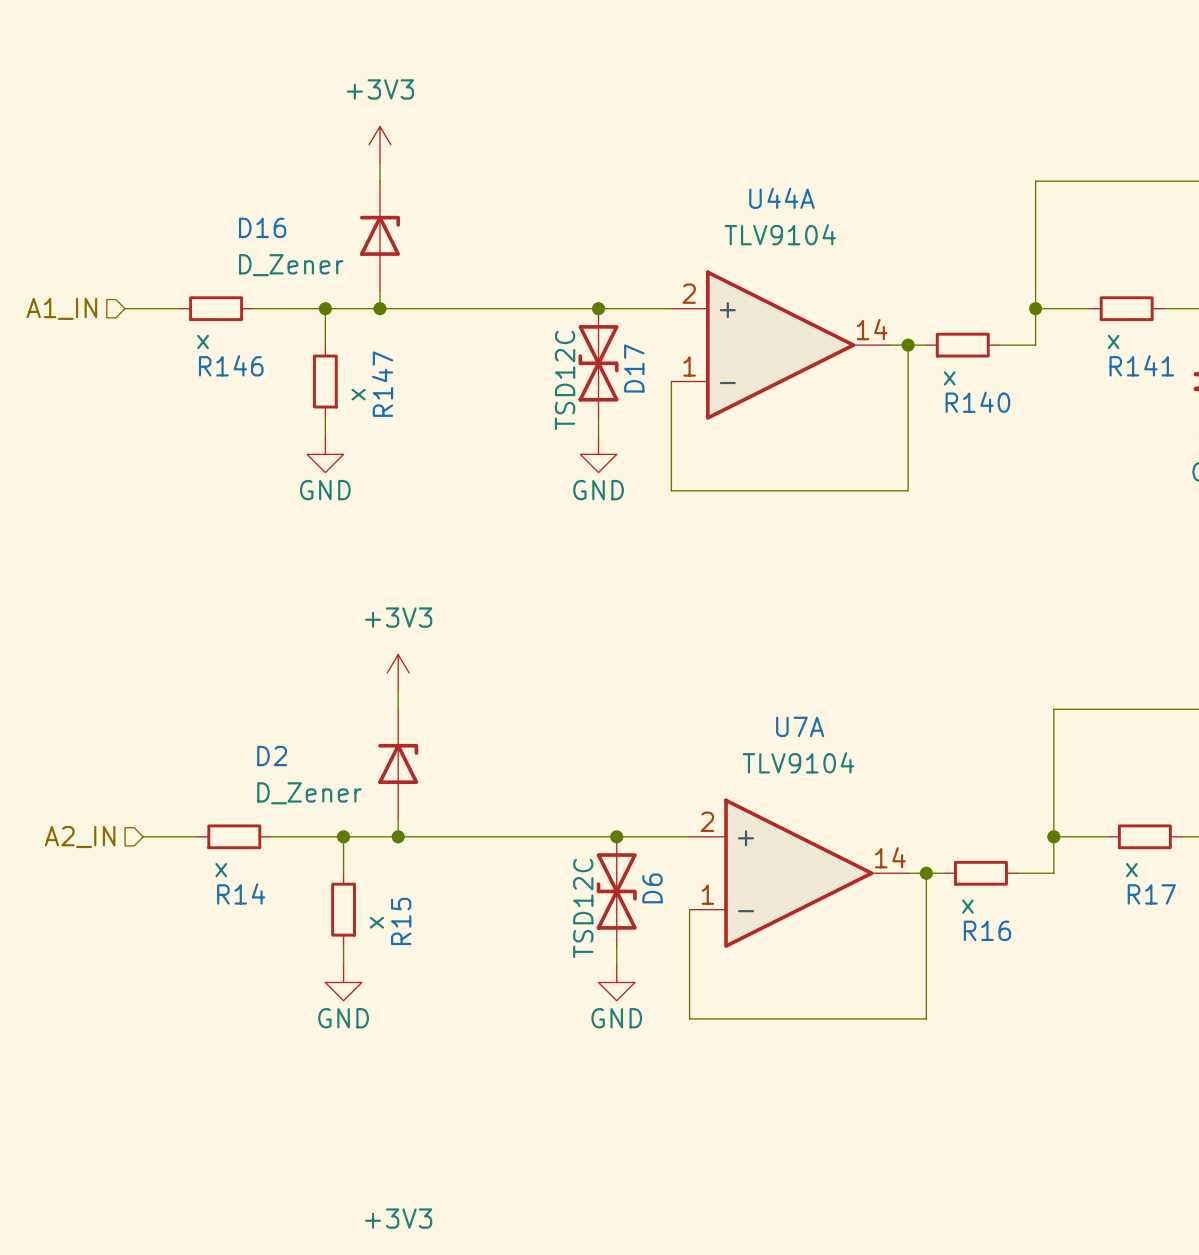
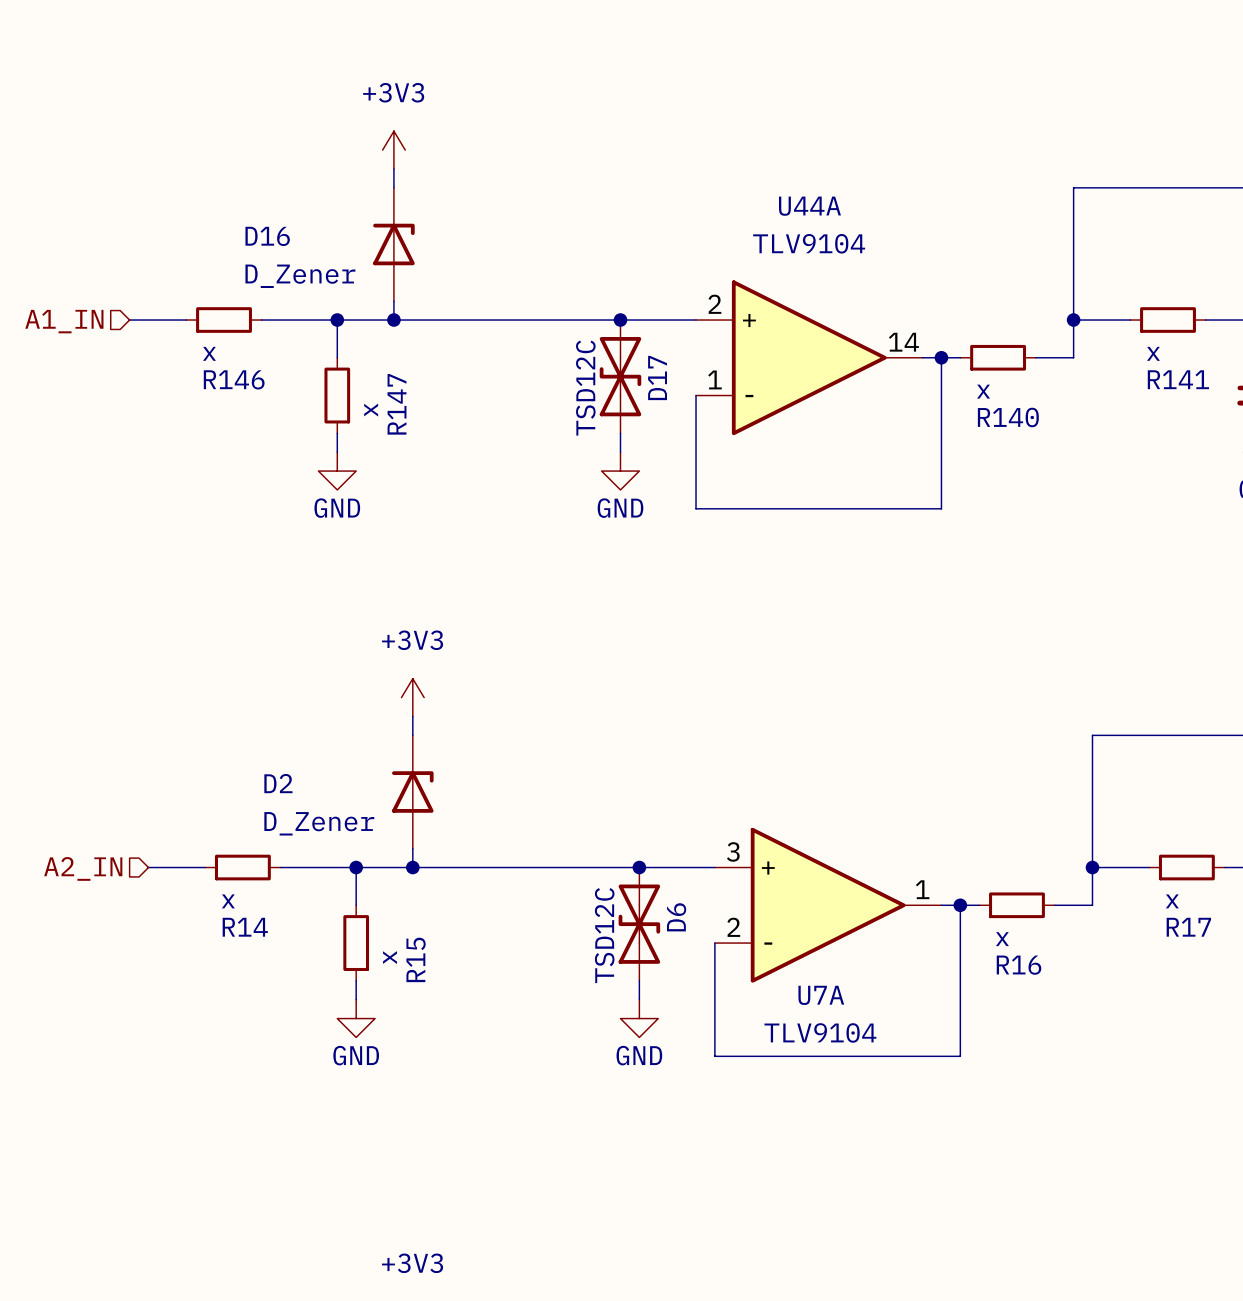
U7A name position: U7A (800, 726) -> U7A (821, 995)
U7A value position: TLV9104 (798, 762) -> TLV9104 (820, 1032)
U7A pin number: 2 (707, 821) -> 3 (733, 851)
U7A pin number: 14 (890, 857) -> 1 (922, 889)
U7A pin number: 1 (707, 894) -> 2 (733, 927)

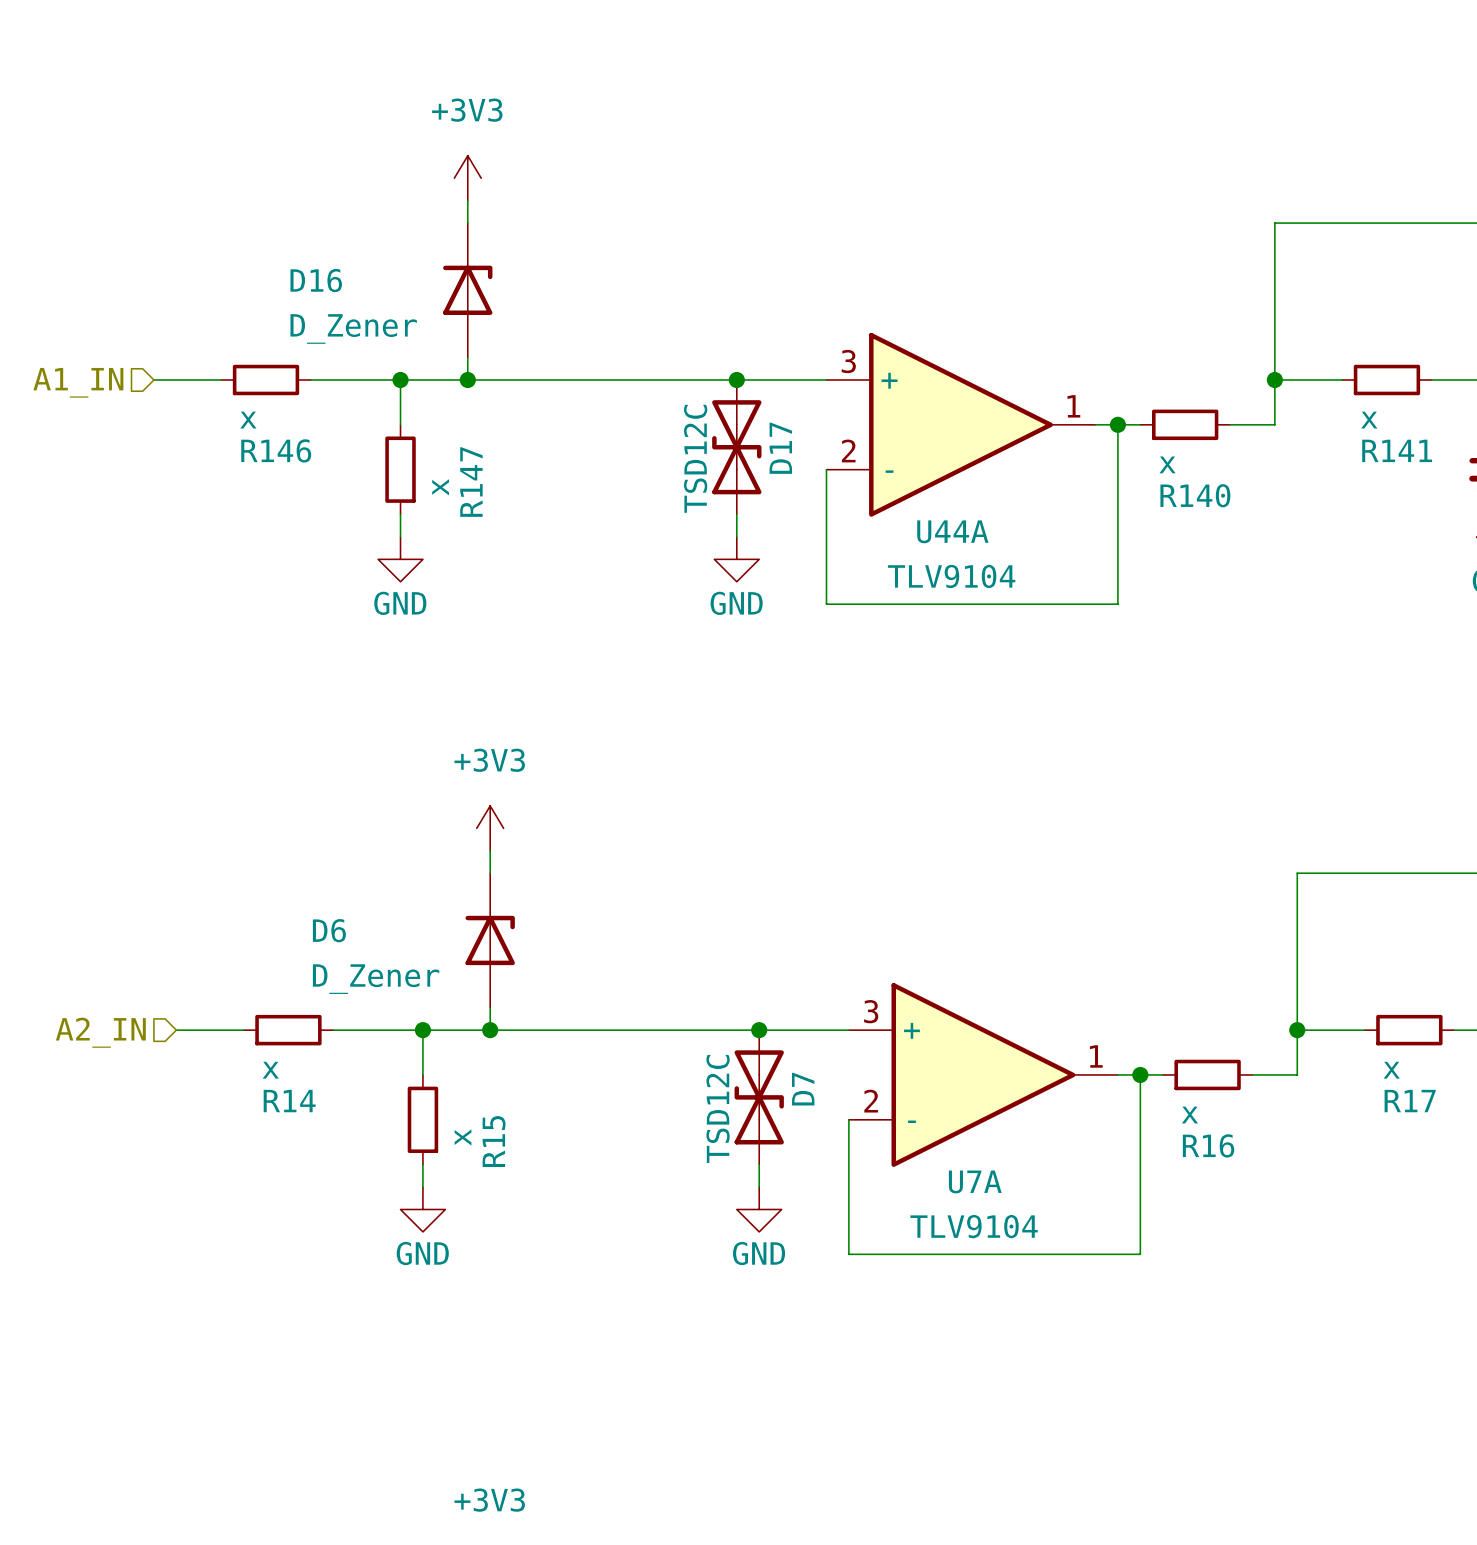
U44A name position: U44A (809, 206) -> U44A (952, 531)
U44A value position: TLV9104 (809, 243) -> TLV9104 (951, 576)
U44A pin number: 2 (714, 304) -> 3 (848, 361)
U44A pin number: 14 (903, 342) -> 1 (1073, 406)
U44A pin number: 1 (714, 379) -> 2 (848, 450)
D2 name: D2 (278, 783) -> D6 (329, 930)
D6 name: D6 (676, 917) -> D7 (803, 1089)

